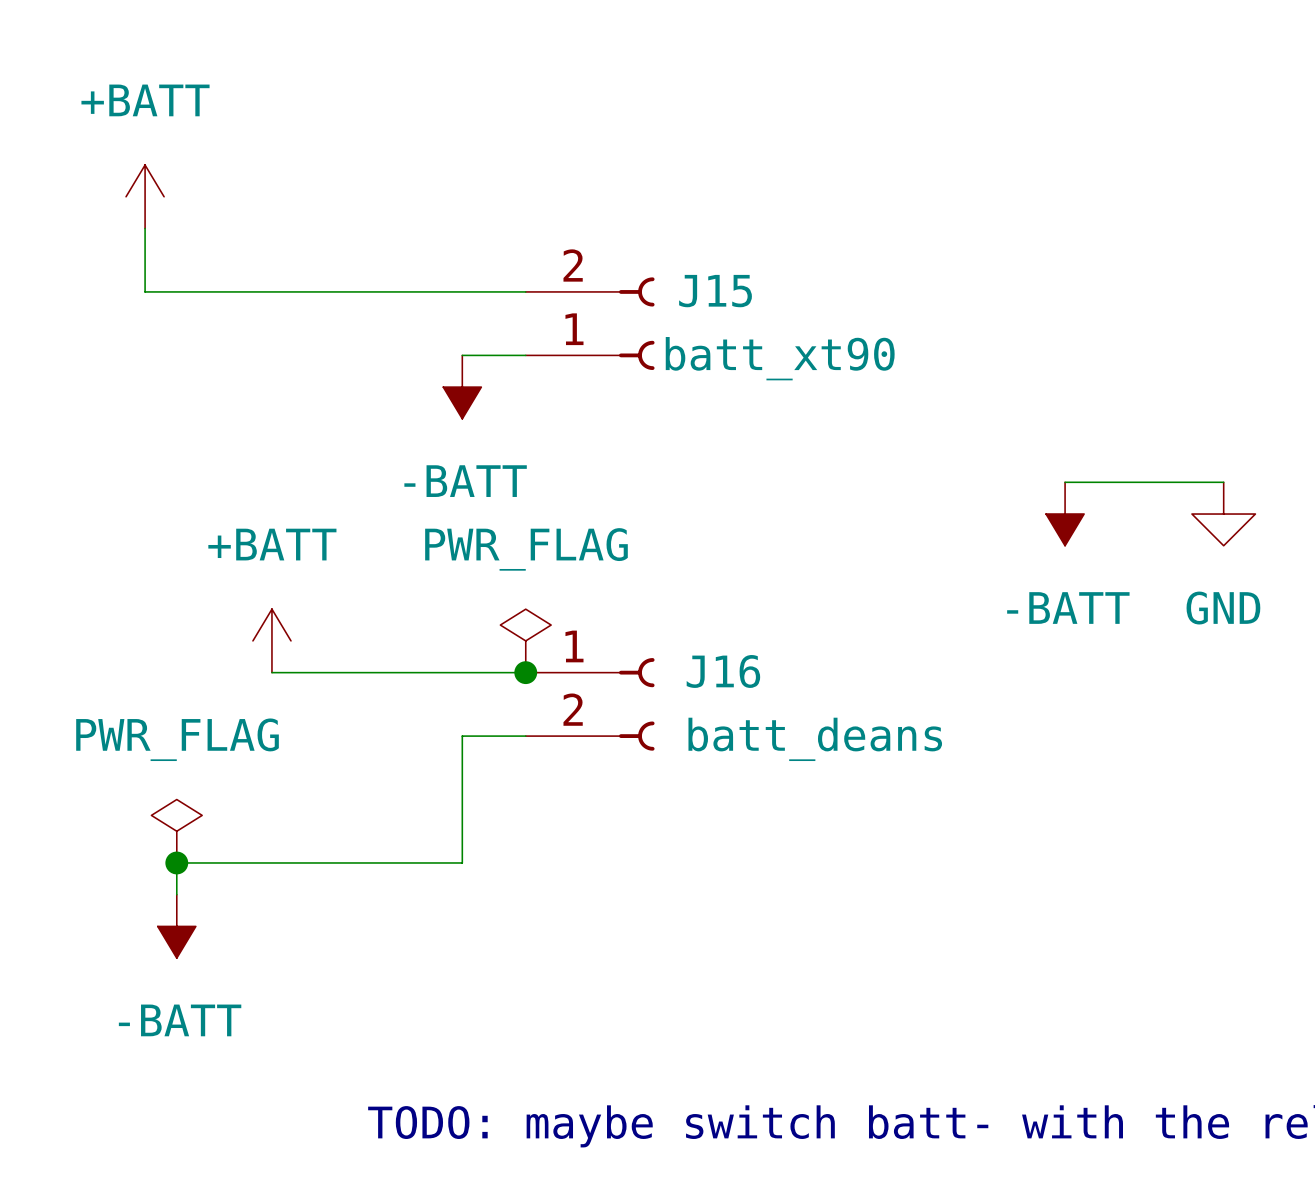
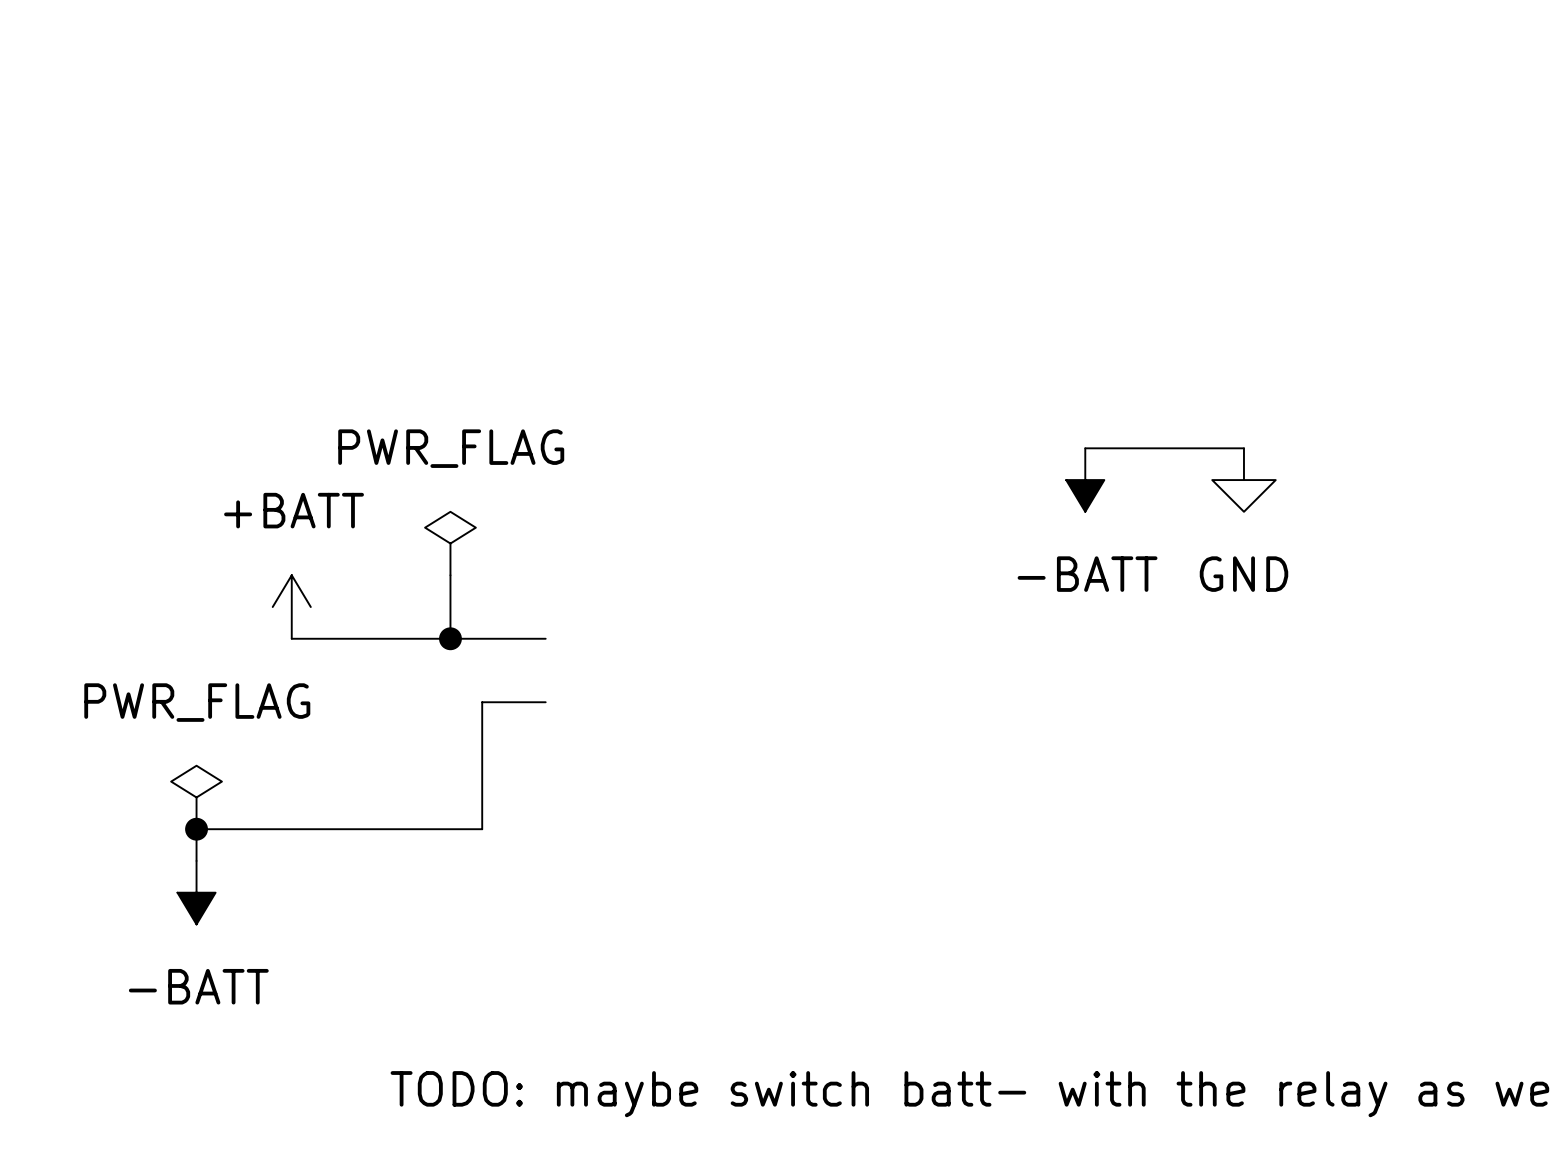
power symbol: +BATT (145, 196) -> none
wire: (145, 228) (145, 291) (525, 291) -> none
J15: batt_xt90 (590, 323) -> none
wire: (462, 355) (525, 355) -> none
power symbol: -BATT (462, 387) -> none
wire: none -> (450, 575) (450, 638)
power symbol position: PWR_FLAG (525, 640) -> PWR_FLAG (450, 543)
junction position: (525, 672) -> (450, 638)
J16: batt_deans (590, 704) -> none

